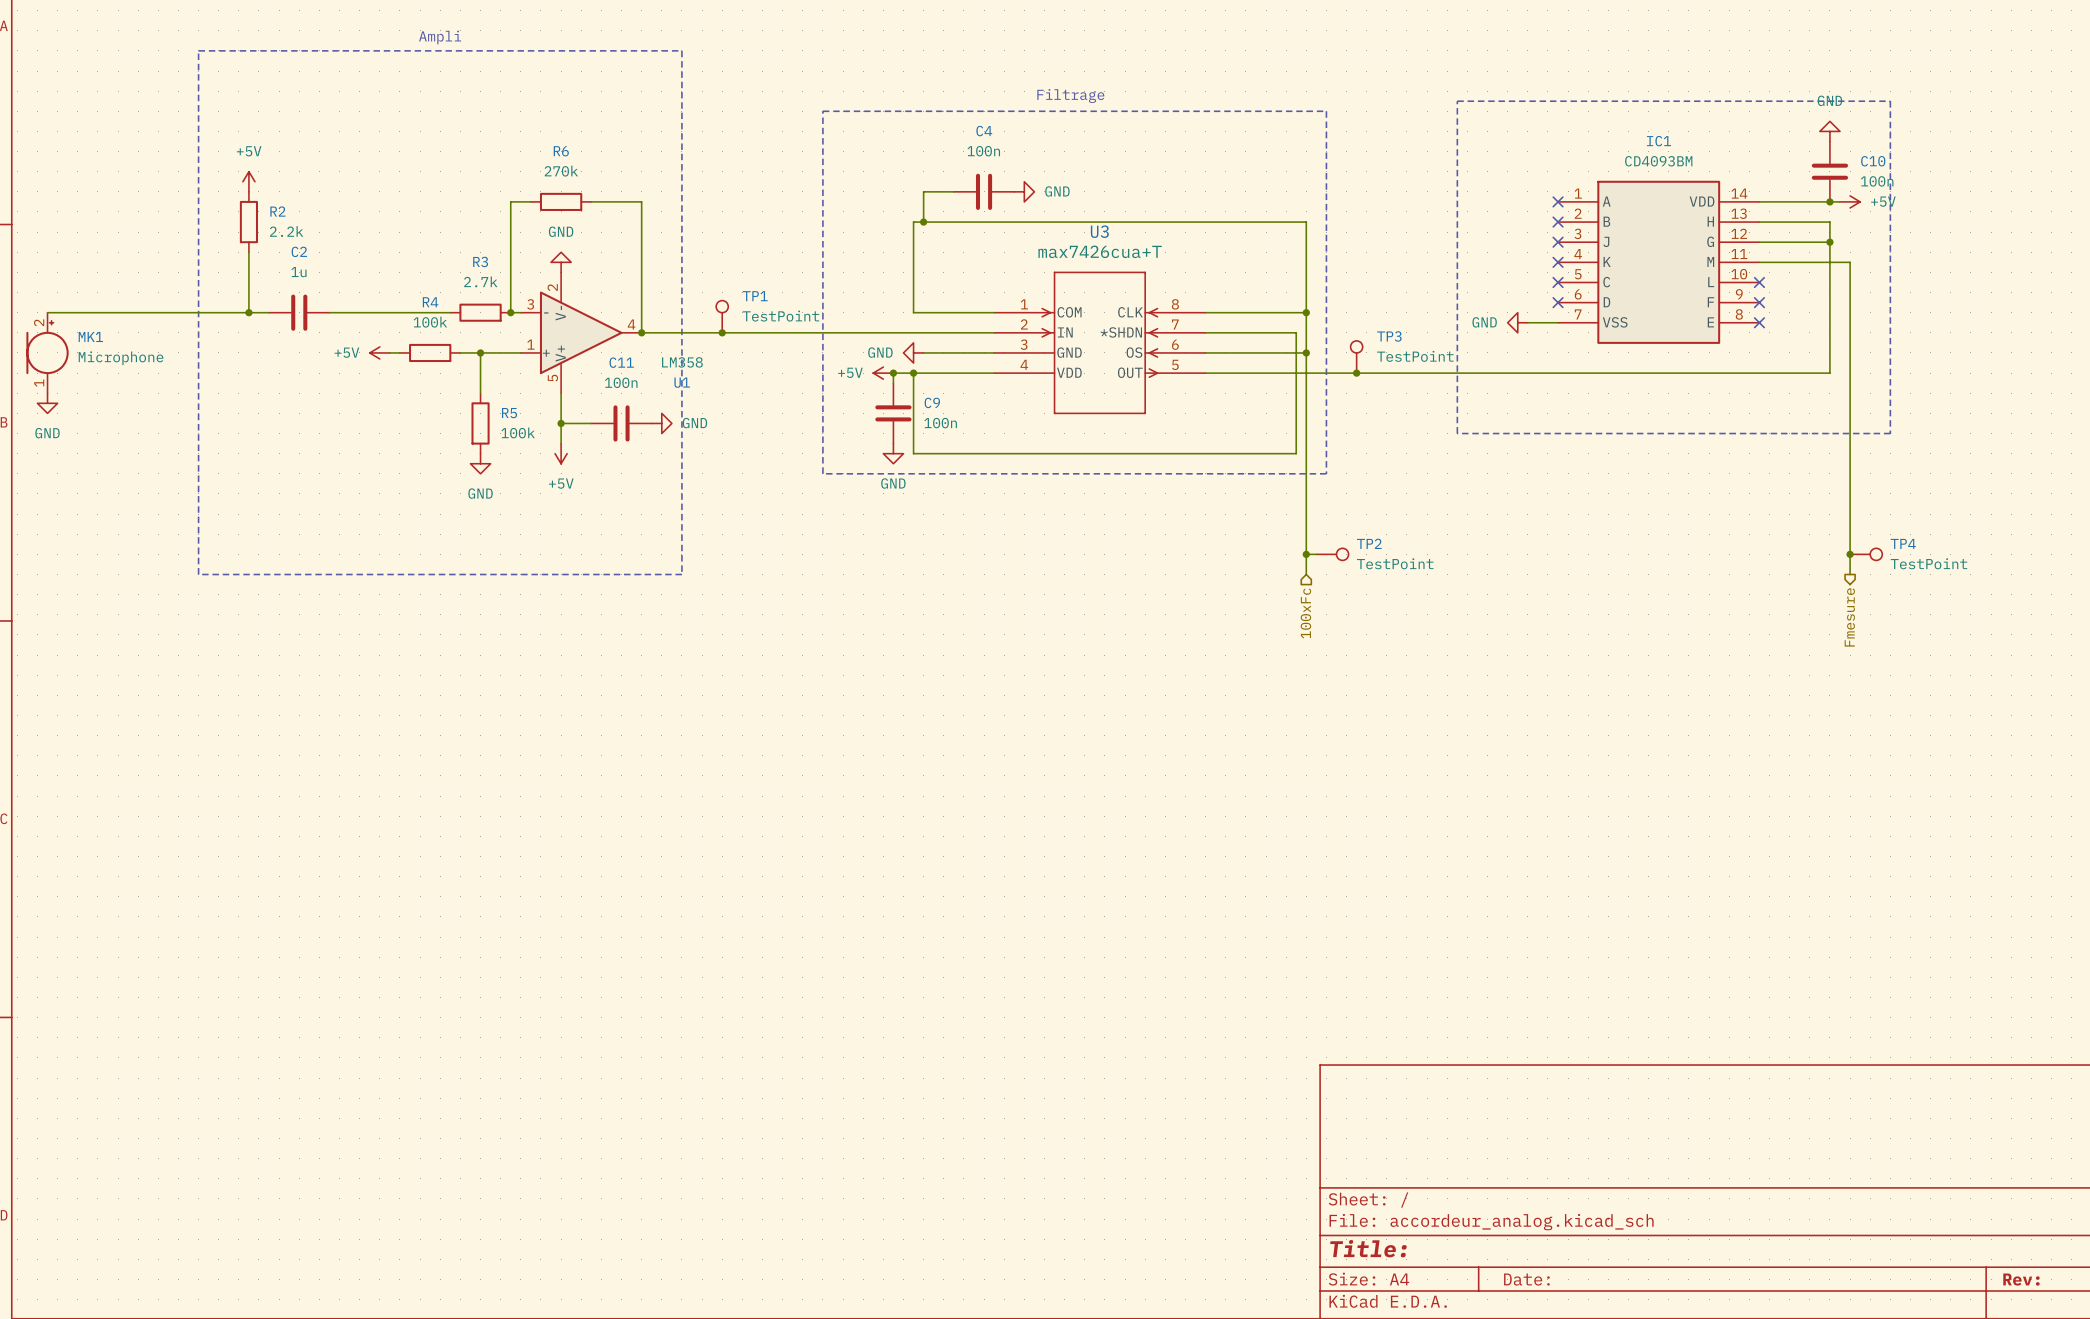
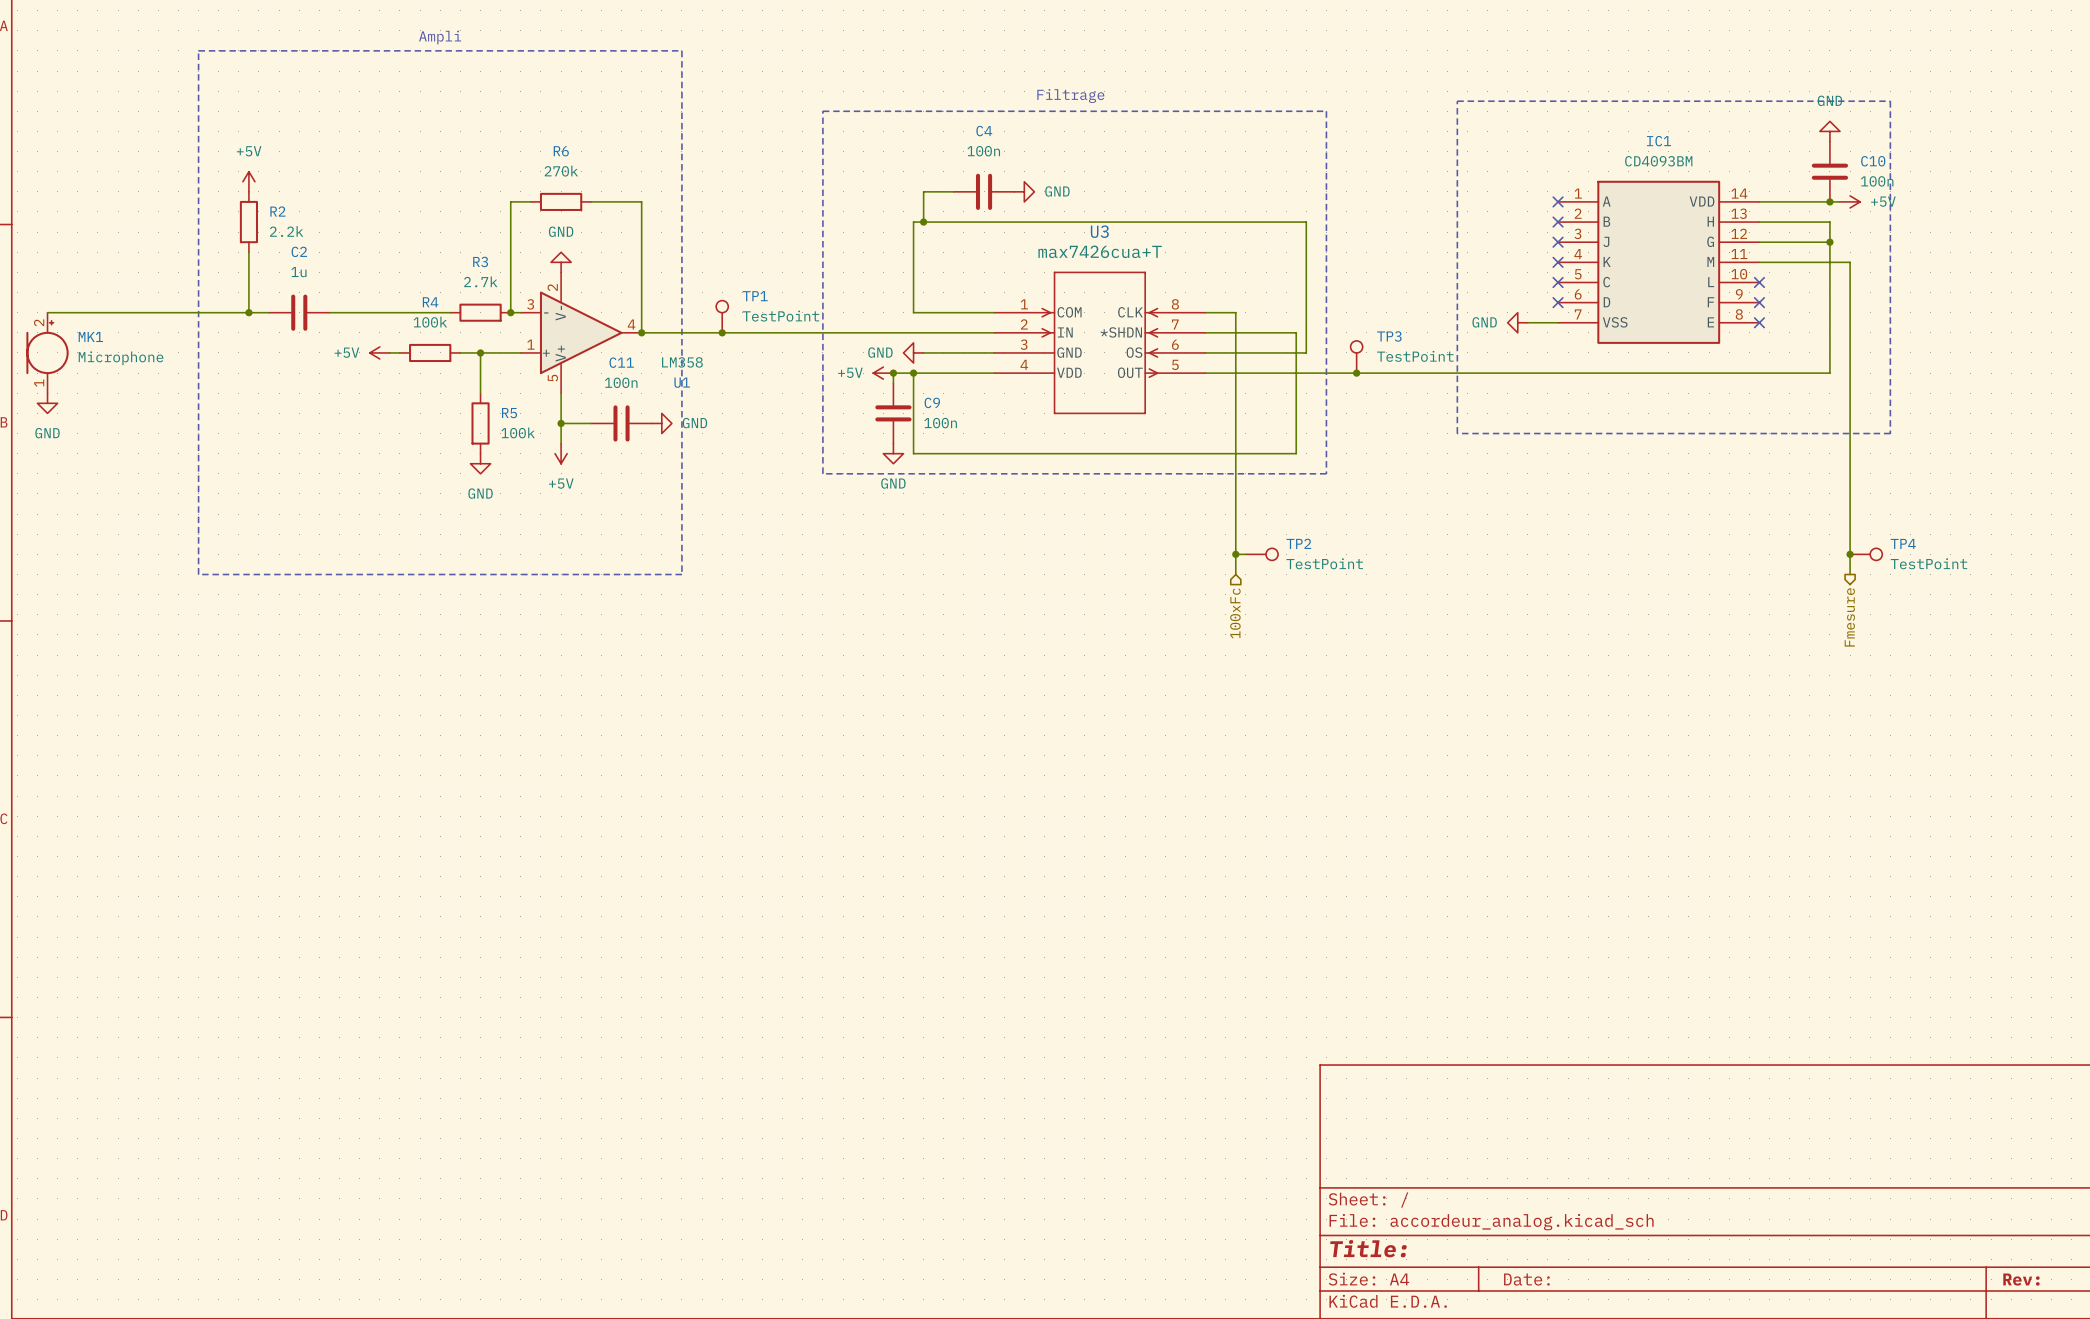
wire: (1235, 312) (1306, 312) -> (1235, 312) (1235, 574)
junction: (1306, 312) -> none
wire: (1306, 352) (1306, 574) -> none
junction: (1306, 352) -> none
junction: none -> (1235, 554)
wire: (1306, 554) (1316, 554) -> (1235, 554) (1245, 554)
junction: (1306, 554) -> none
TP2 position: (1332, 554) -> (1261, 554)
hierarchical label position: 100xFc (1305, 613) -> 100xFc (1235, 613)

